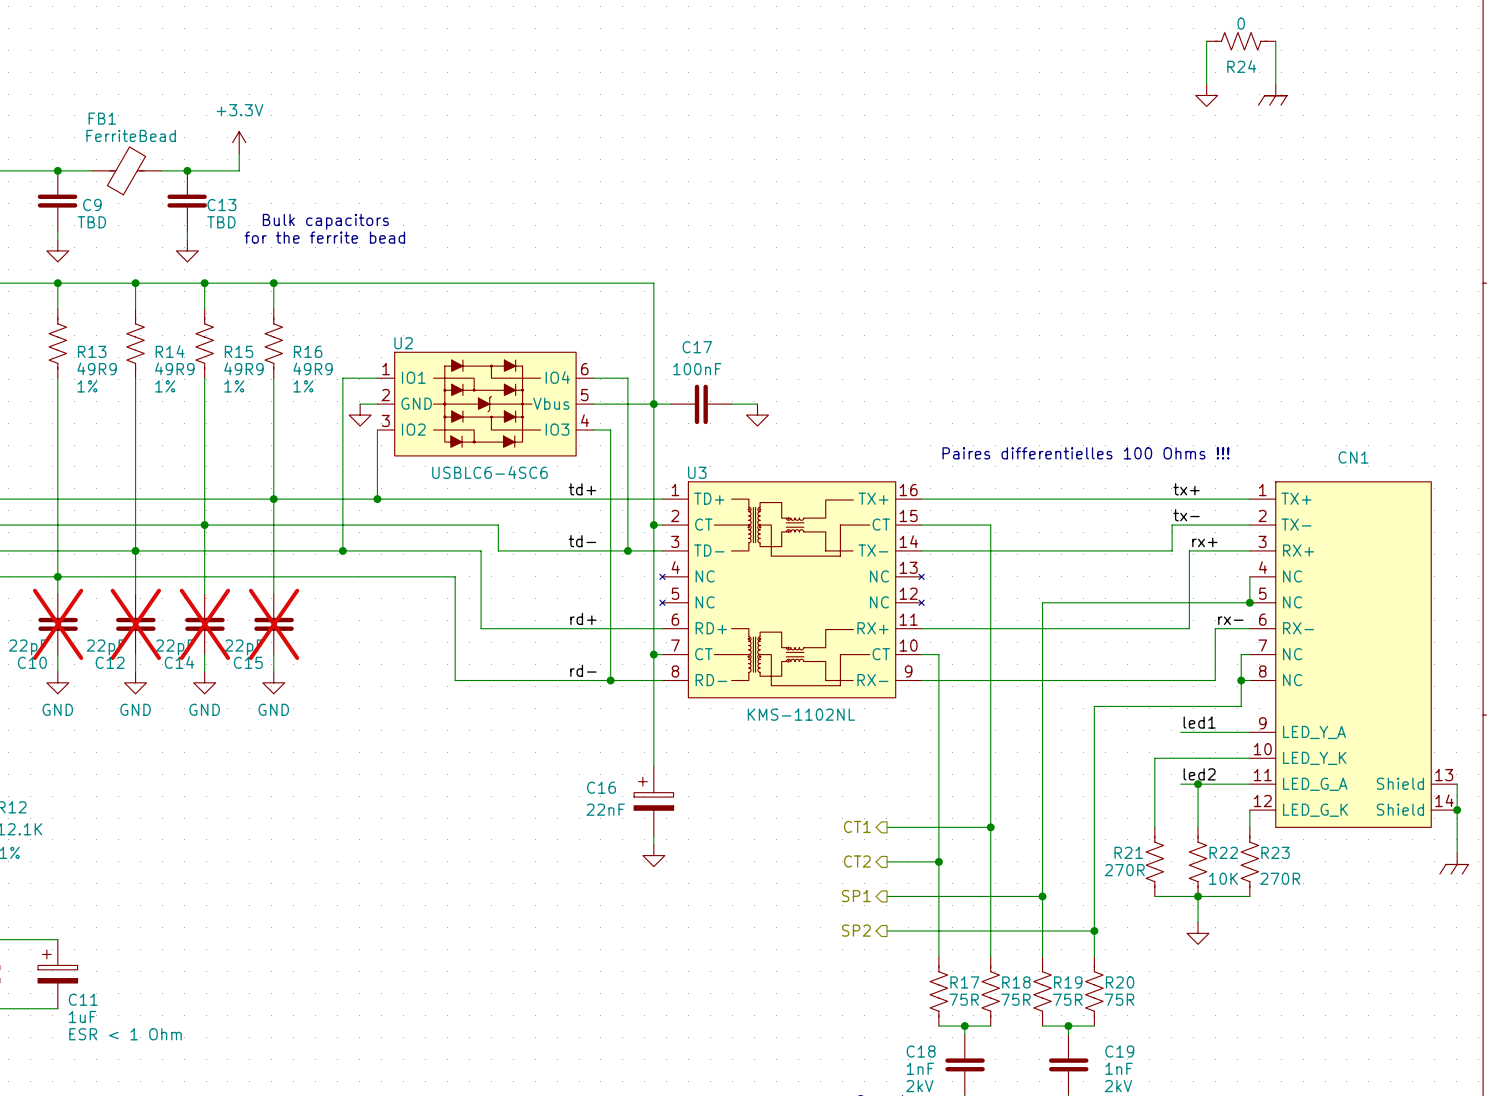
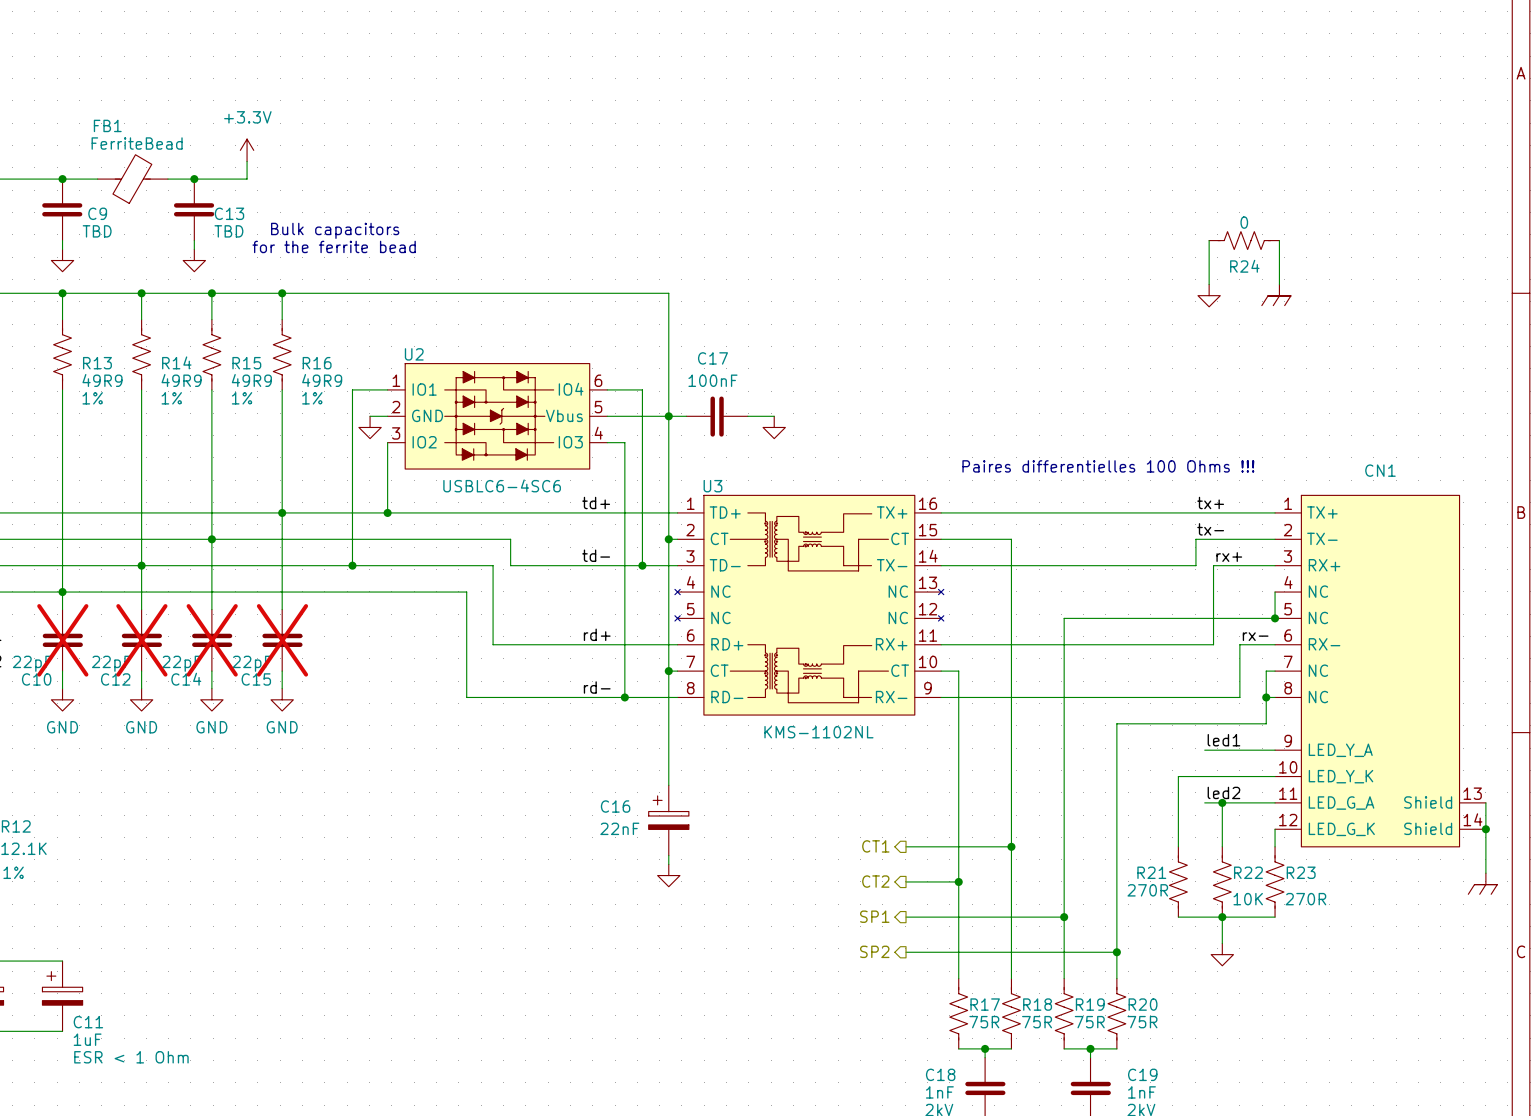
wire: (1206, 41) (1206, 84) -> (1209, 240) (1209, 284)
R24 position: (1241, 41) -> (1244, 240)
wire: (1275, 41) (1275, 84) -> (1279, 240) (1279, 284)
power symbol position: (1272, 94) -> (1276, 295)
power symbol position: (1206, 95) -> (1209, 295)

